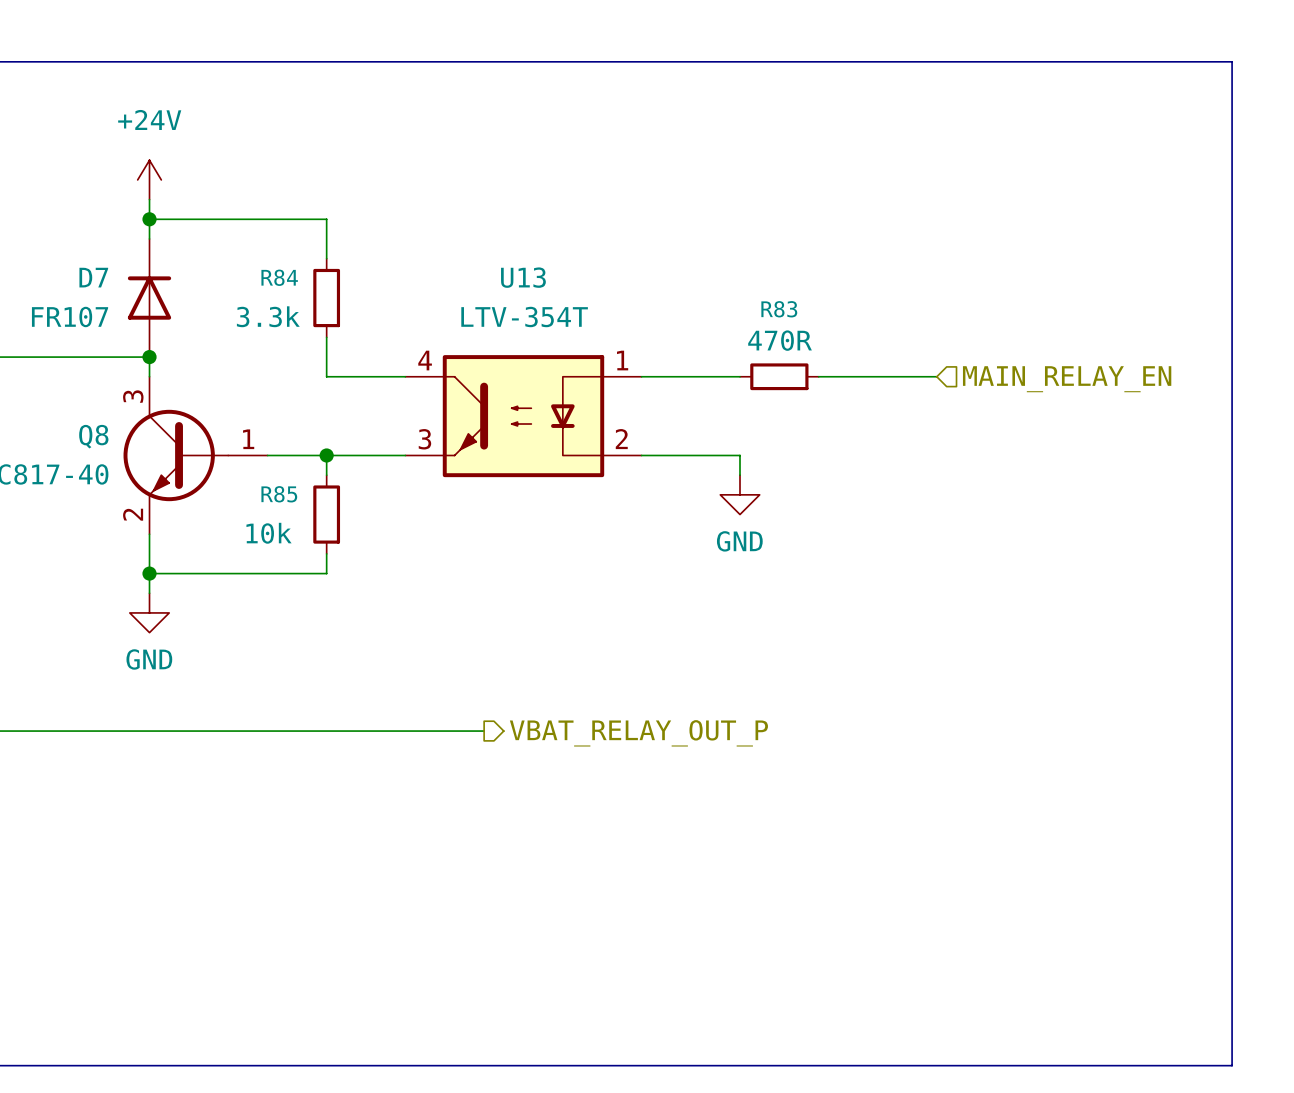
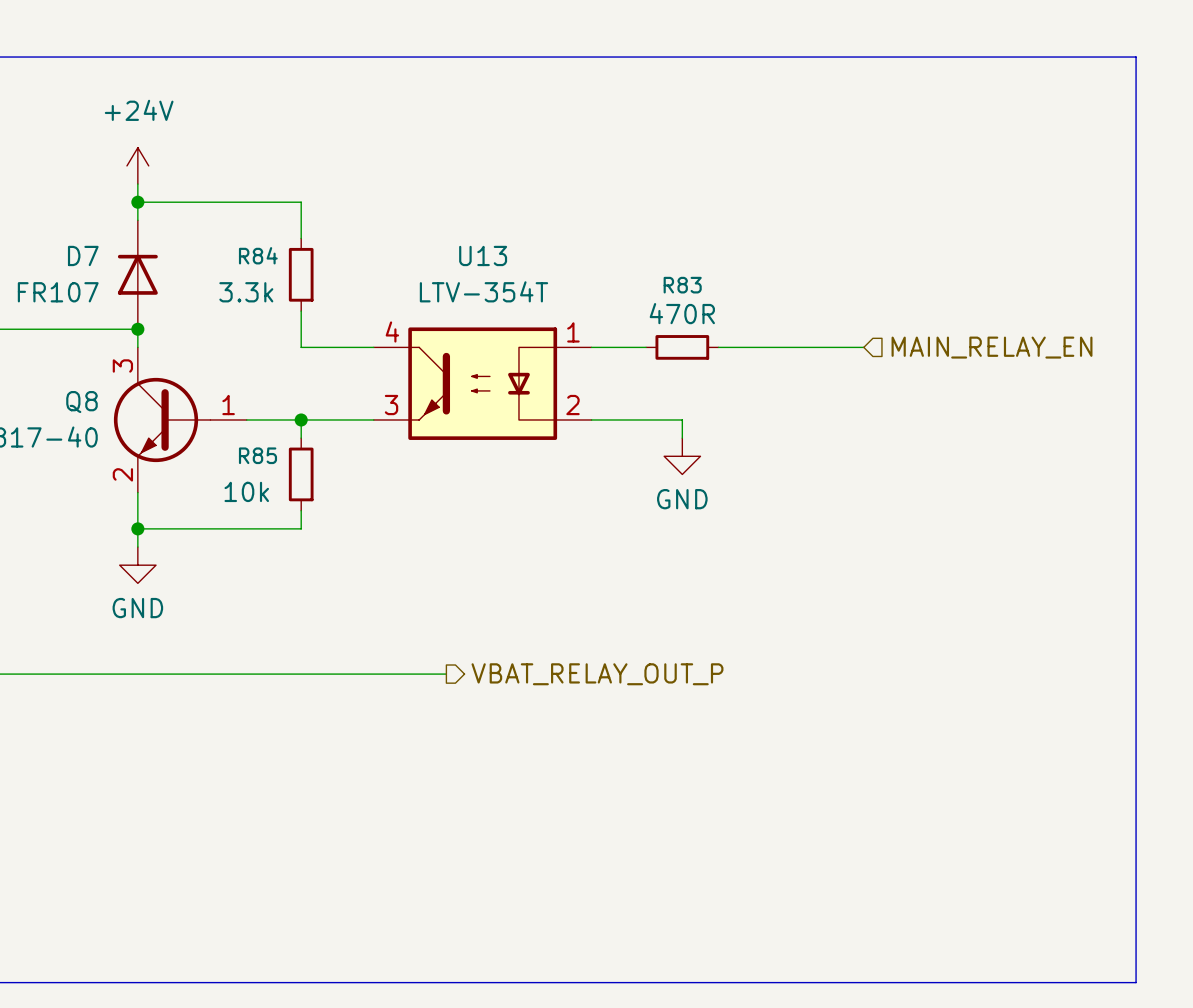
wire: (700, 376) (739, 376) -> (718, 347) (754, 347)
R83 position: (779, 376) -> (682, 347)

